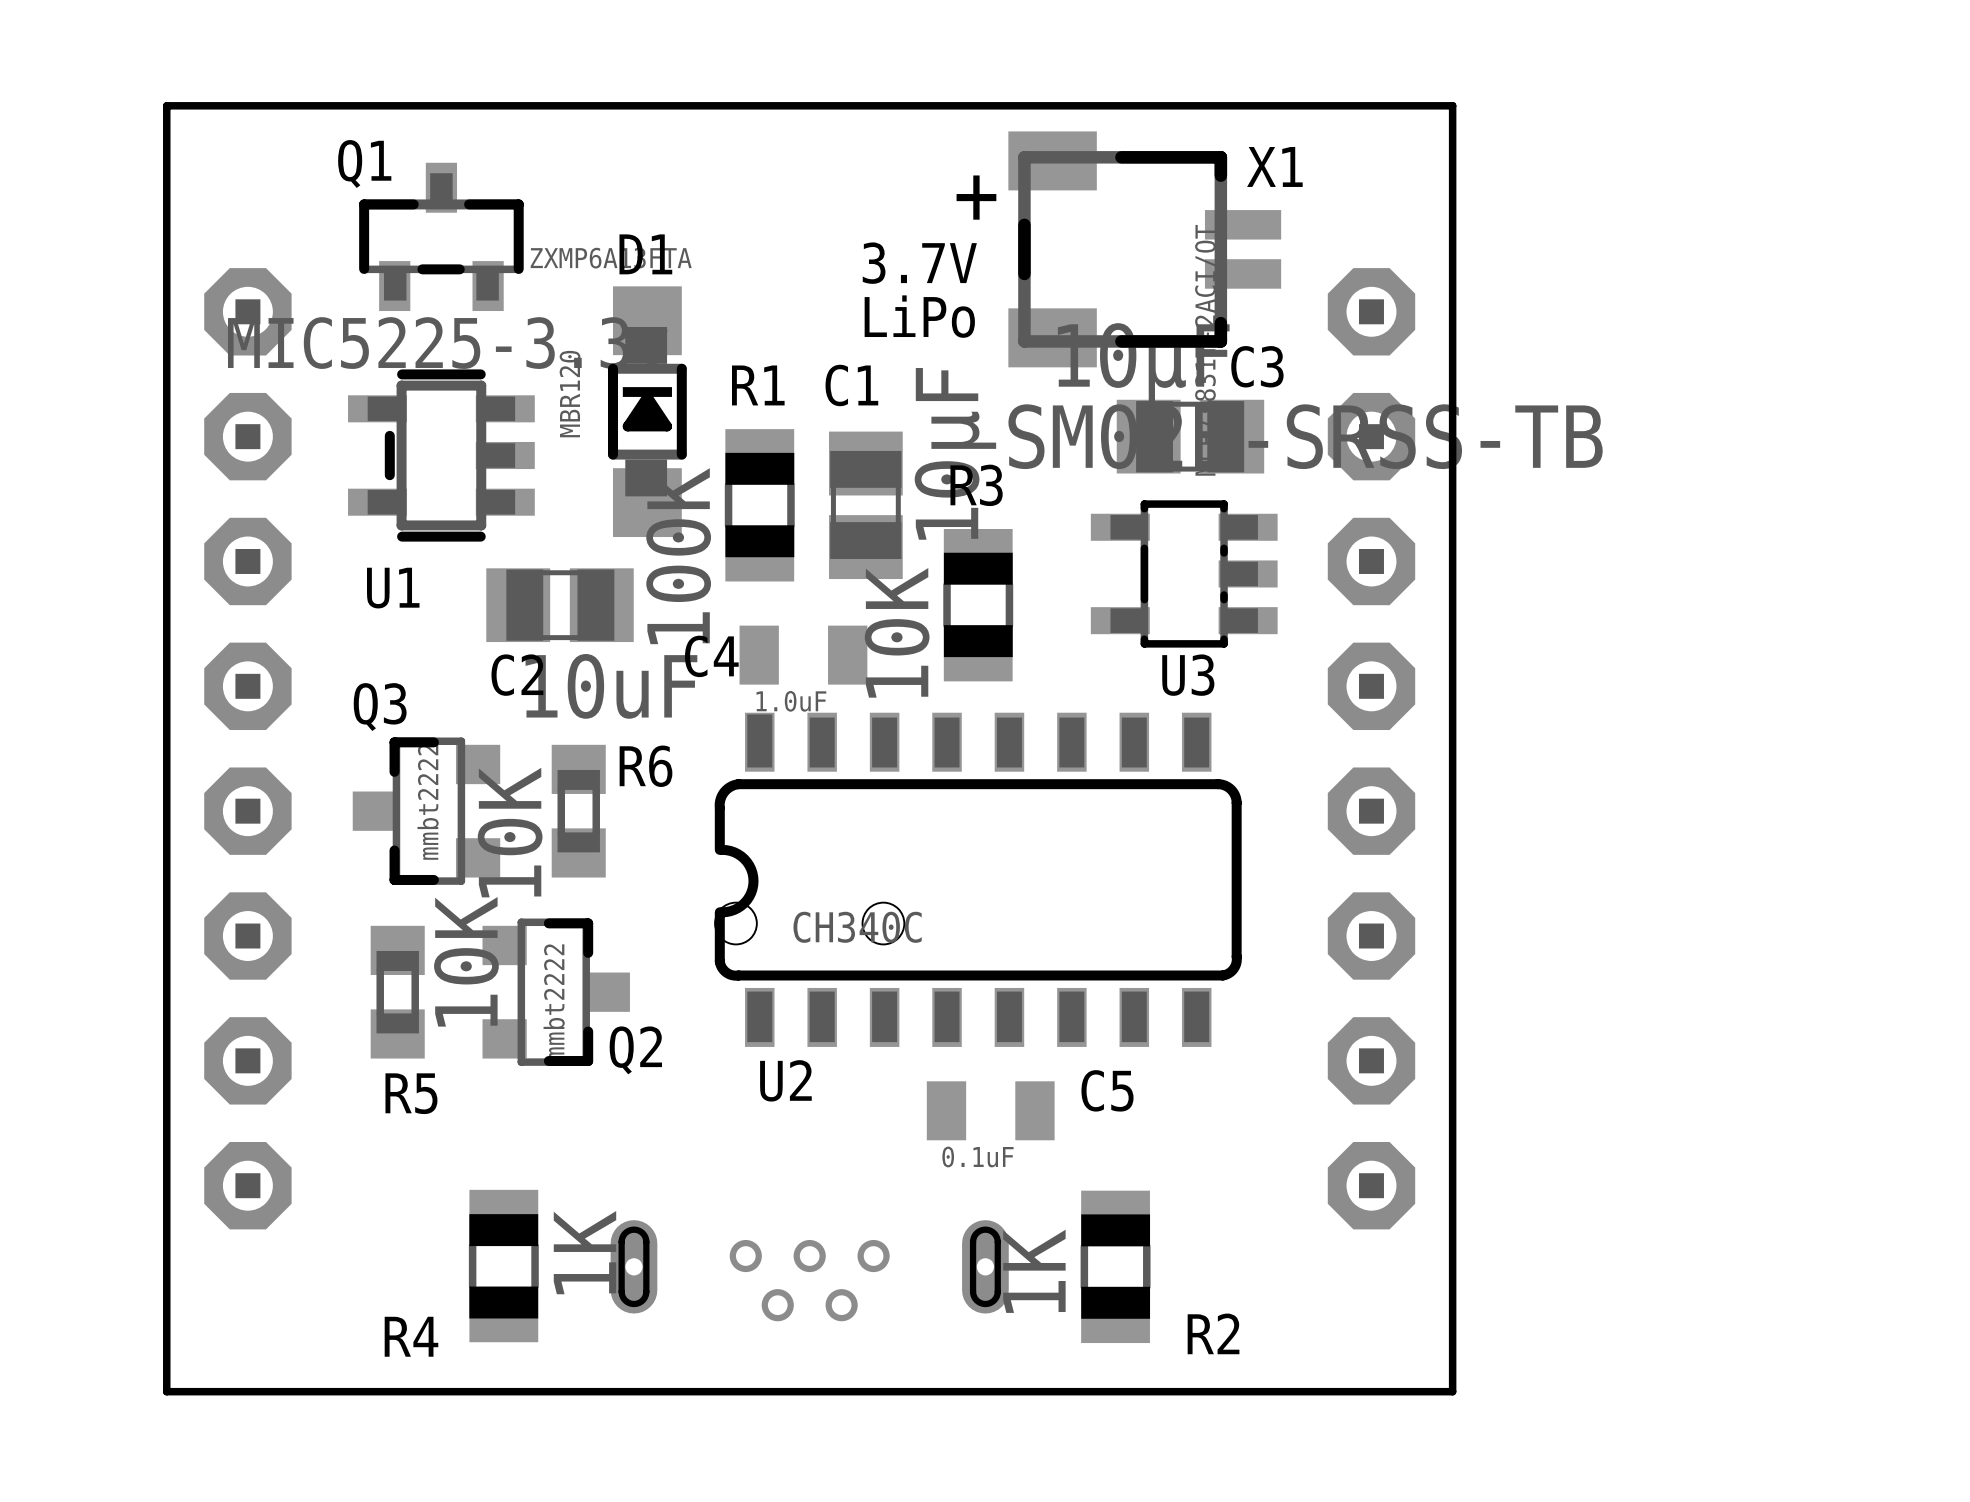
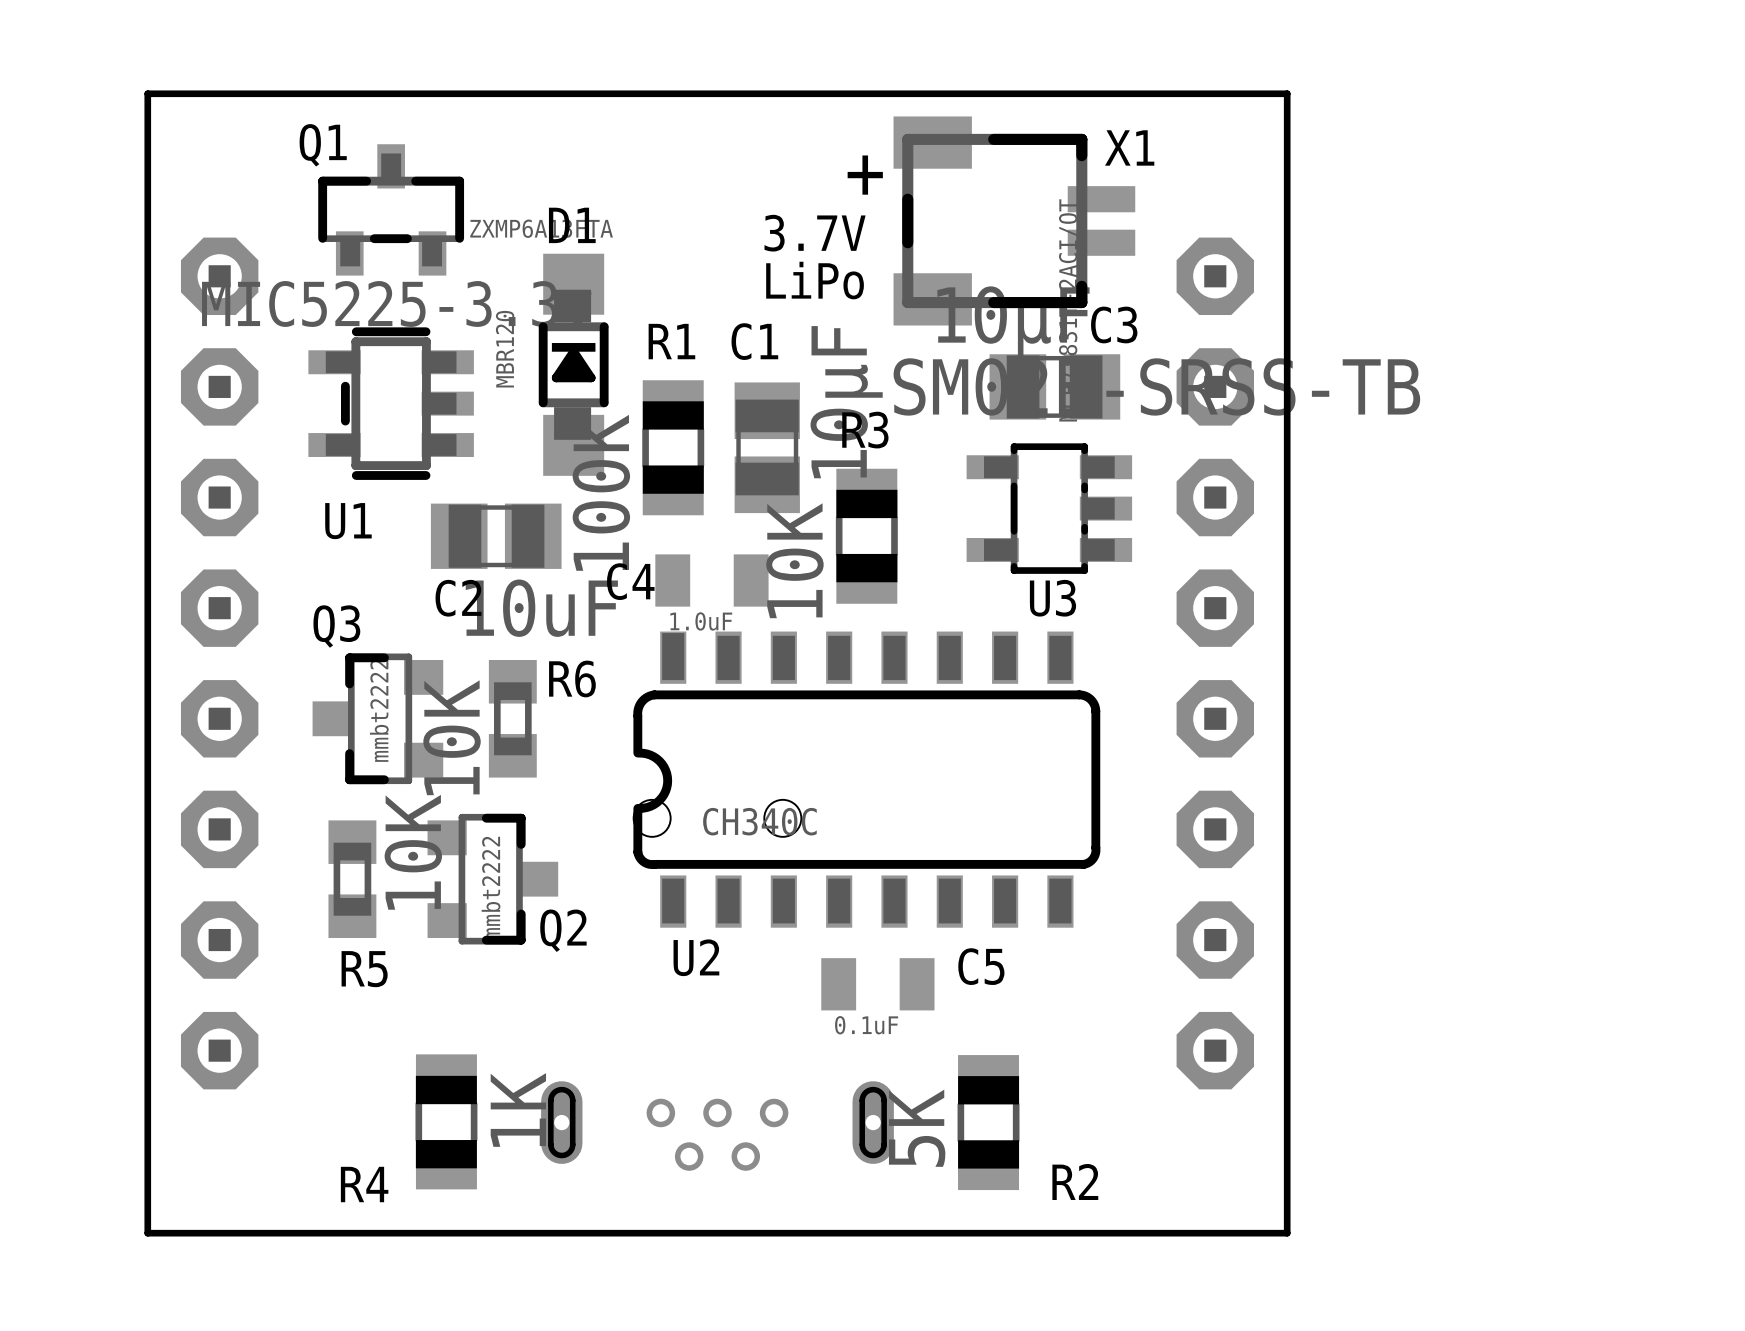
R2 value: 1K (1034, 1271) -> 5K (917, 1128)

